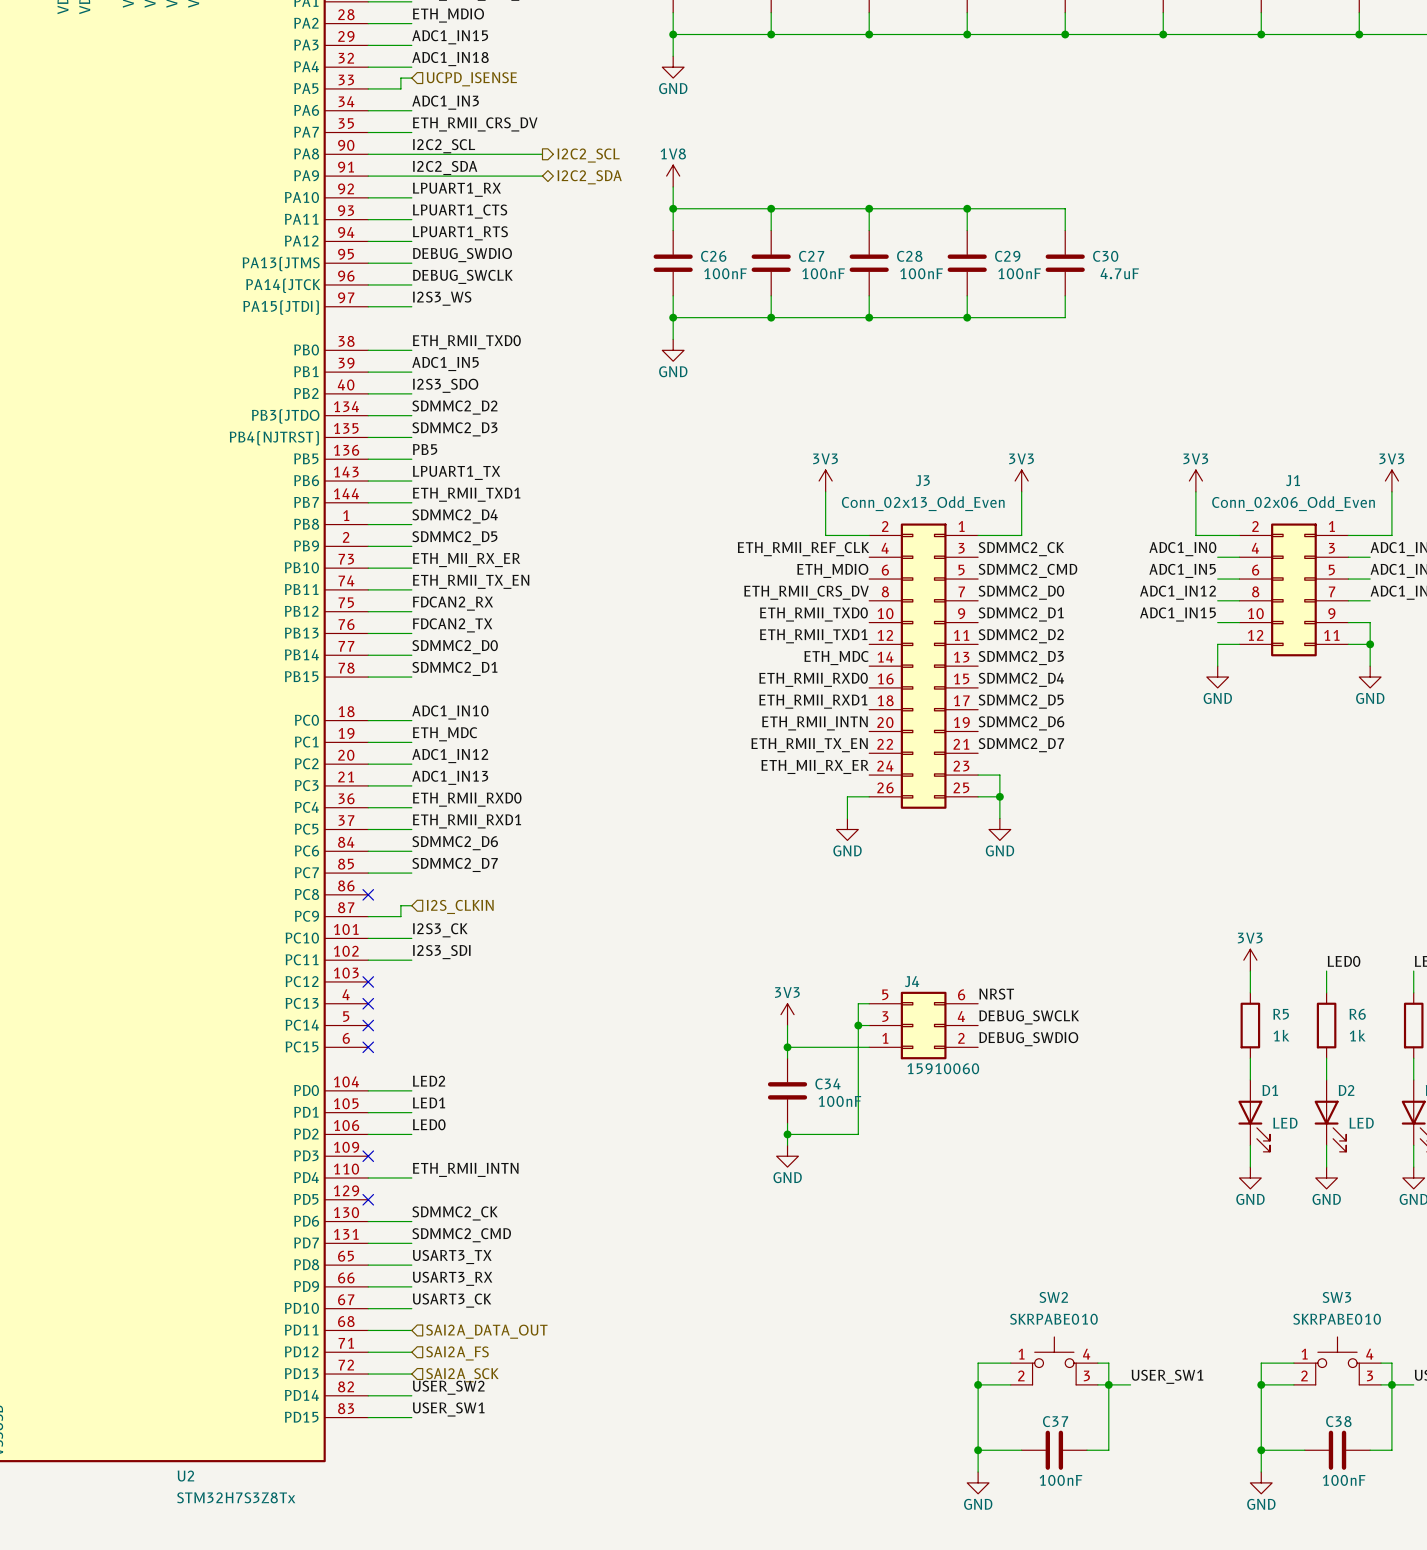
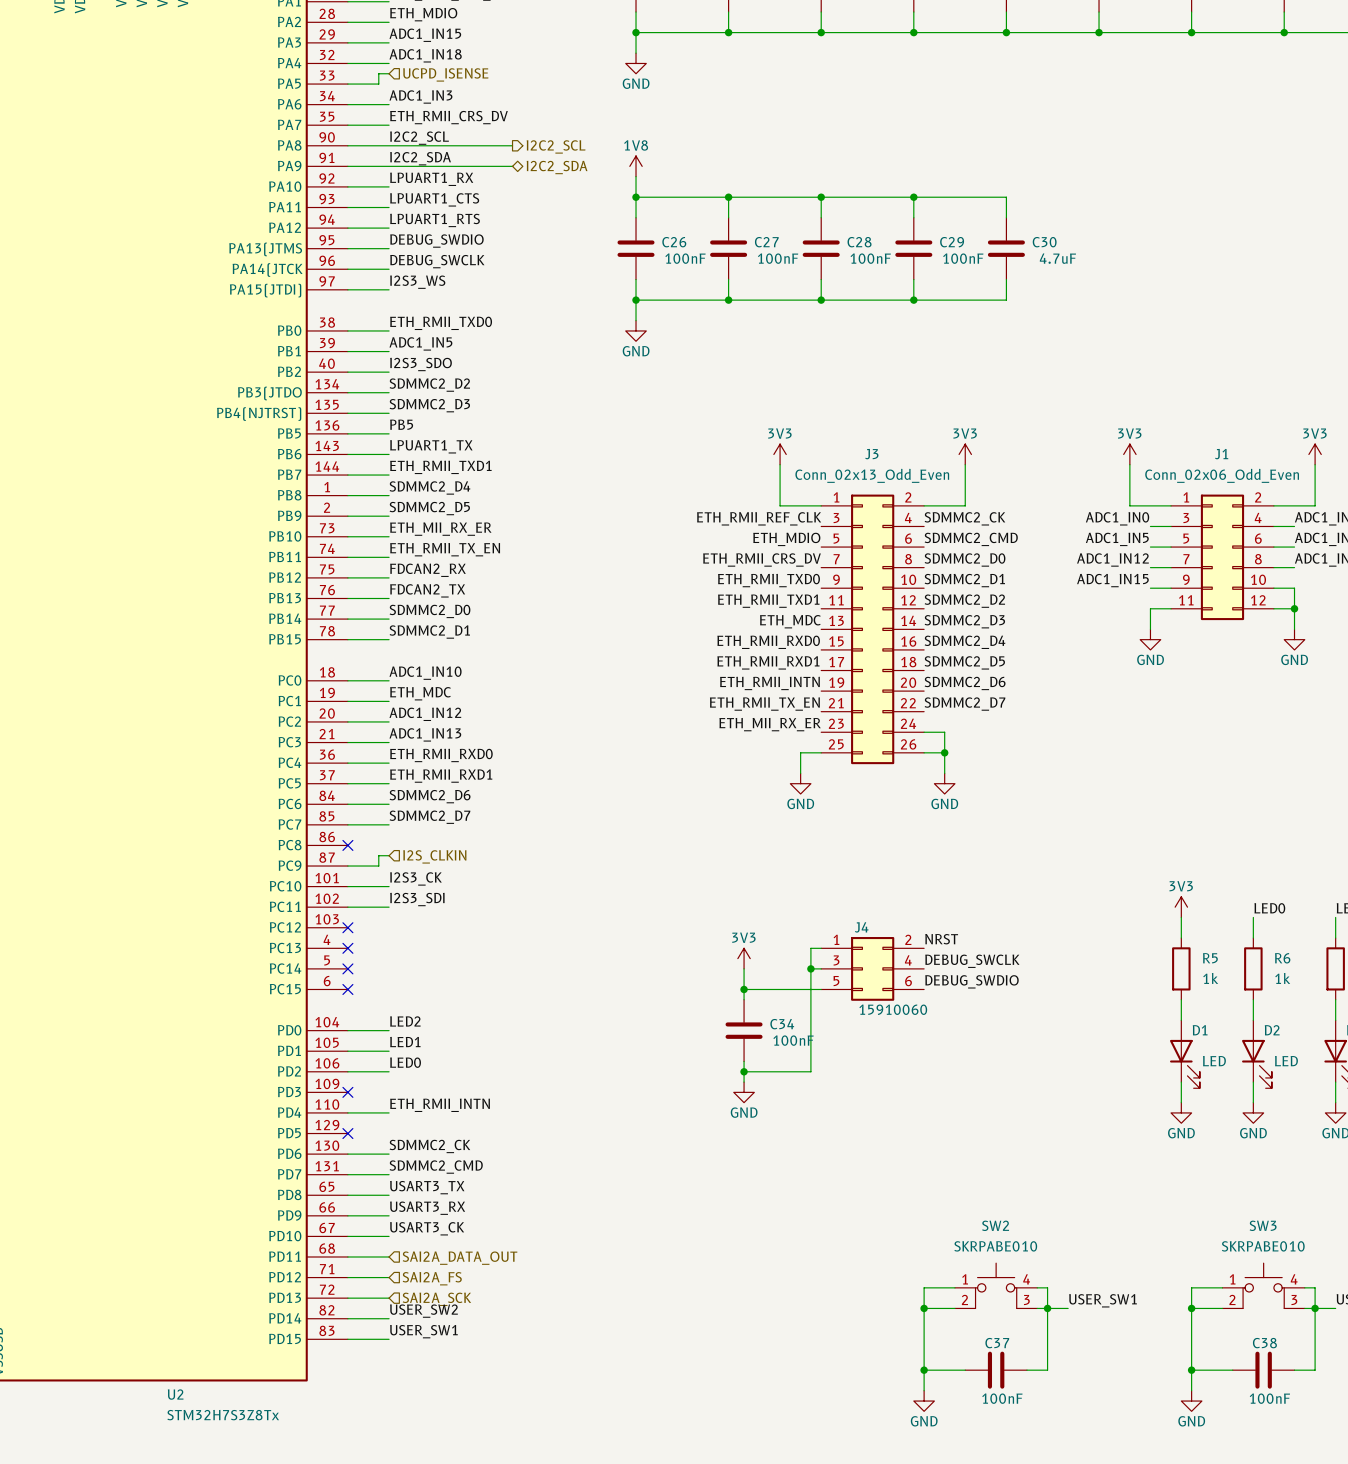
J1 flip: as is (1293, 589) -> left-right (1222, 557)
J3 flip: as is (923, 666) -> left-right (872, 629)
J4 flip: as is (923, 1025) -> up-down (872, 968)

